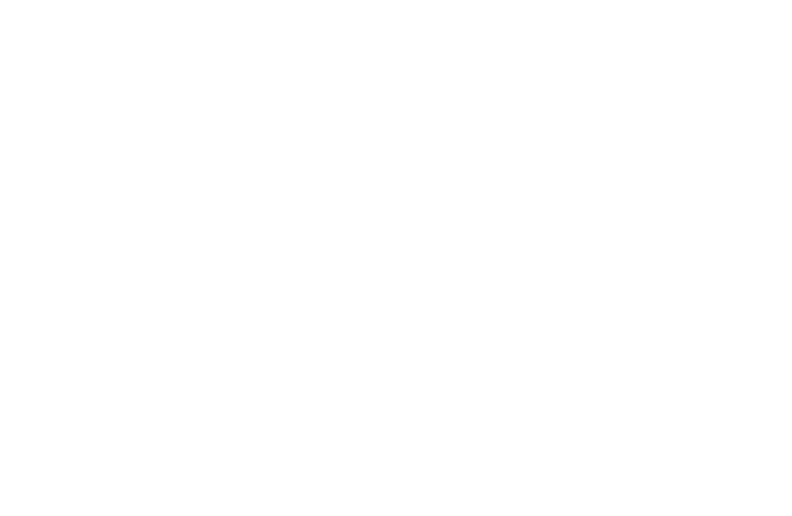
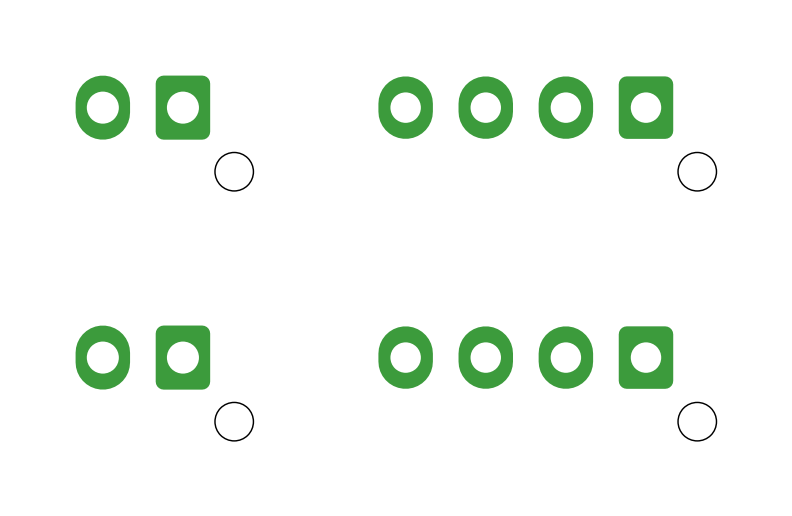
part: none -> (164, 133)
part: none -> (547, 133)
part: none -> (164, 383)
part: none -> (547, 383)

